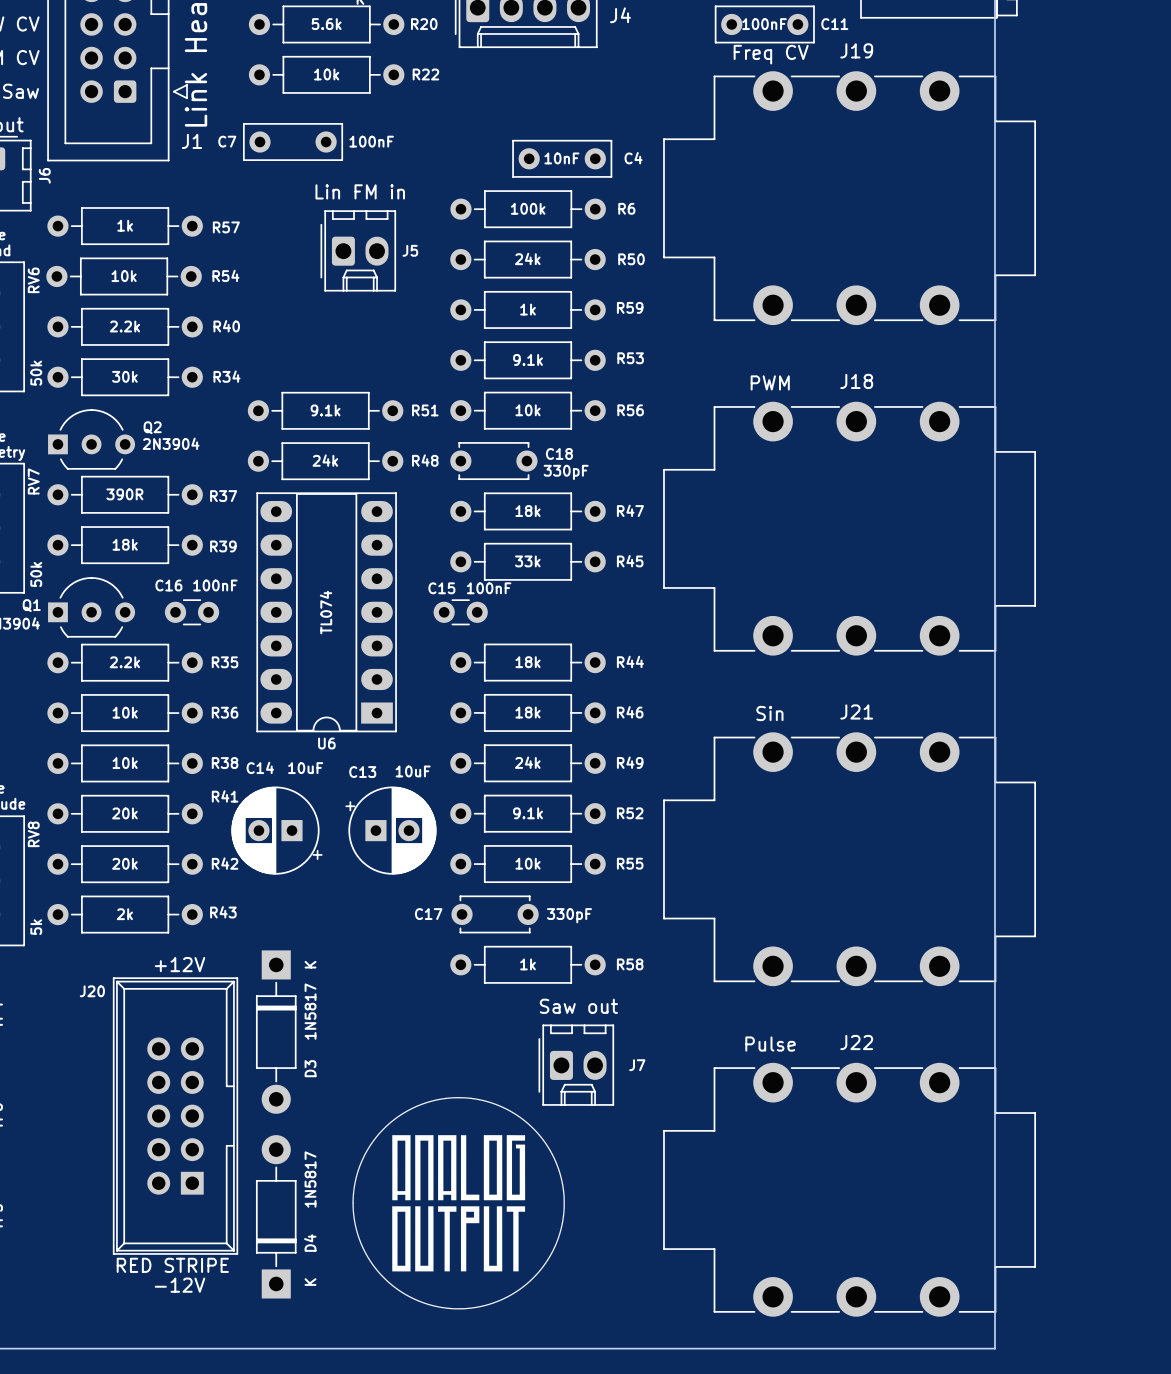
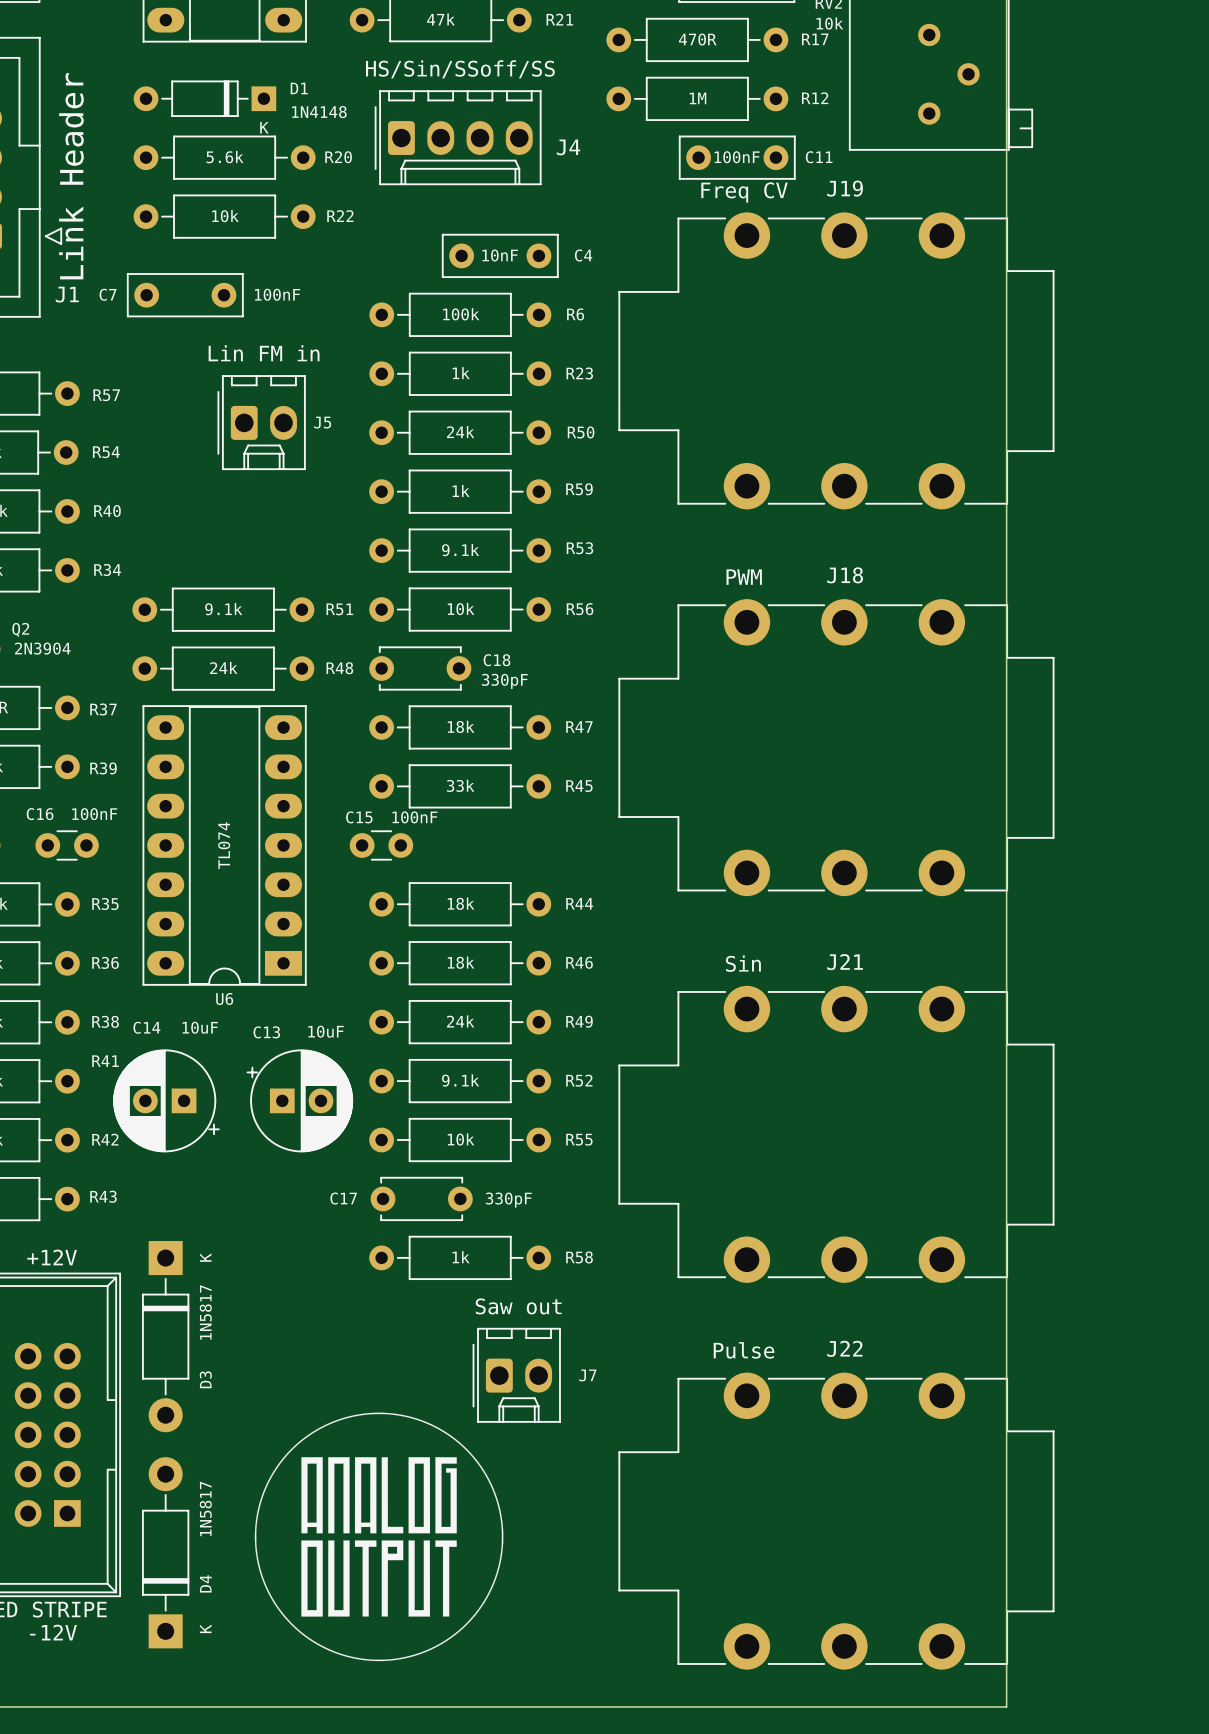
R6: none -> 100k (460, 314)
C4 position: (562, 158) -> (500, 255)
R6 value: 100k (528, 208) -> 1k (461, 373)
R6 name: R6 (626, 208) -> R23 (579, 373)

